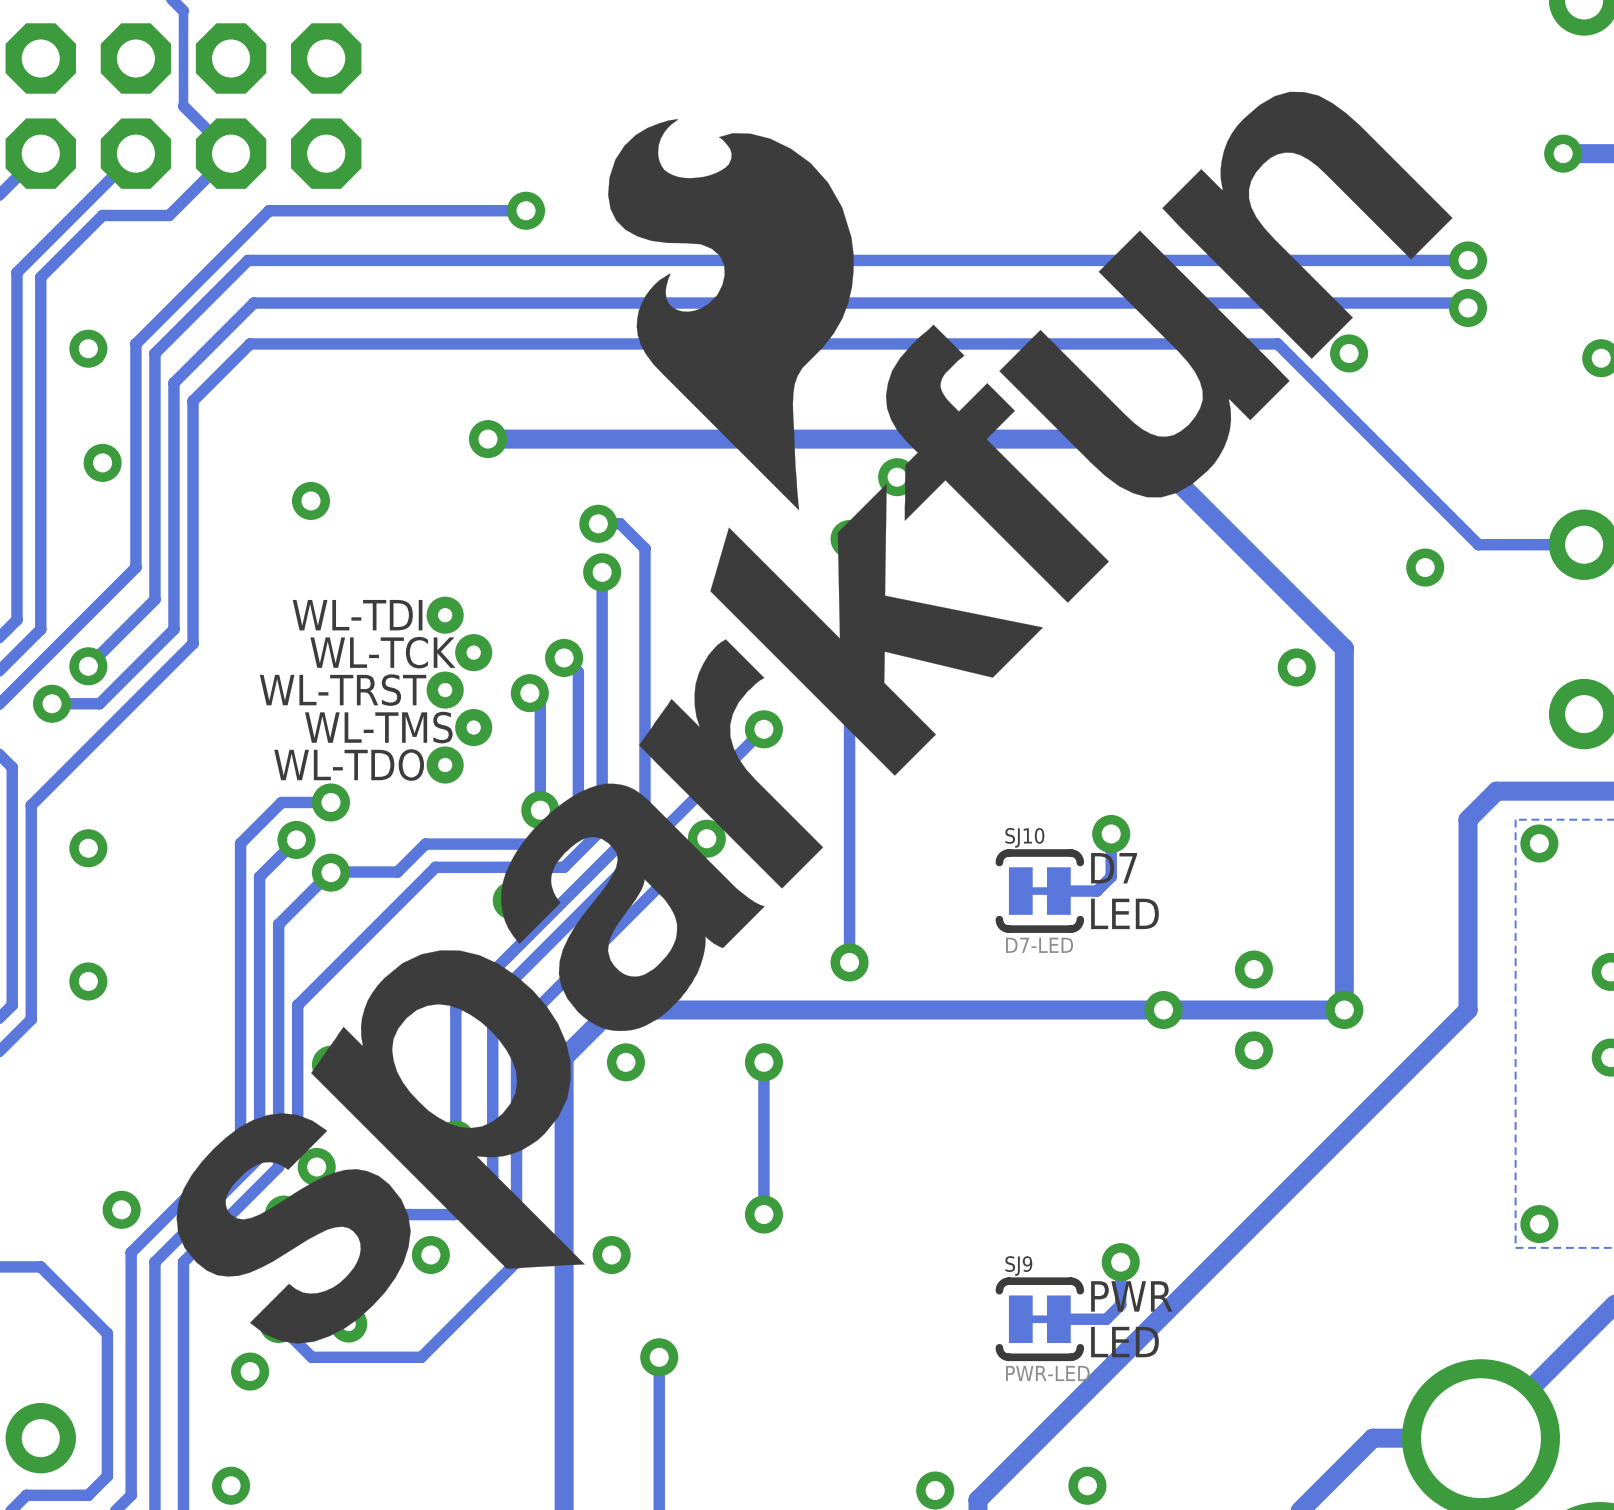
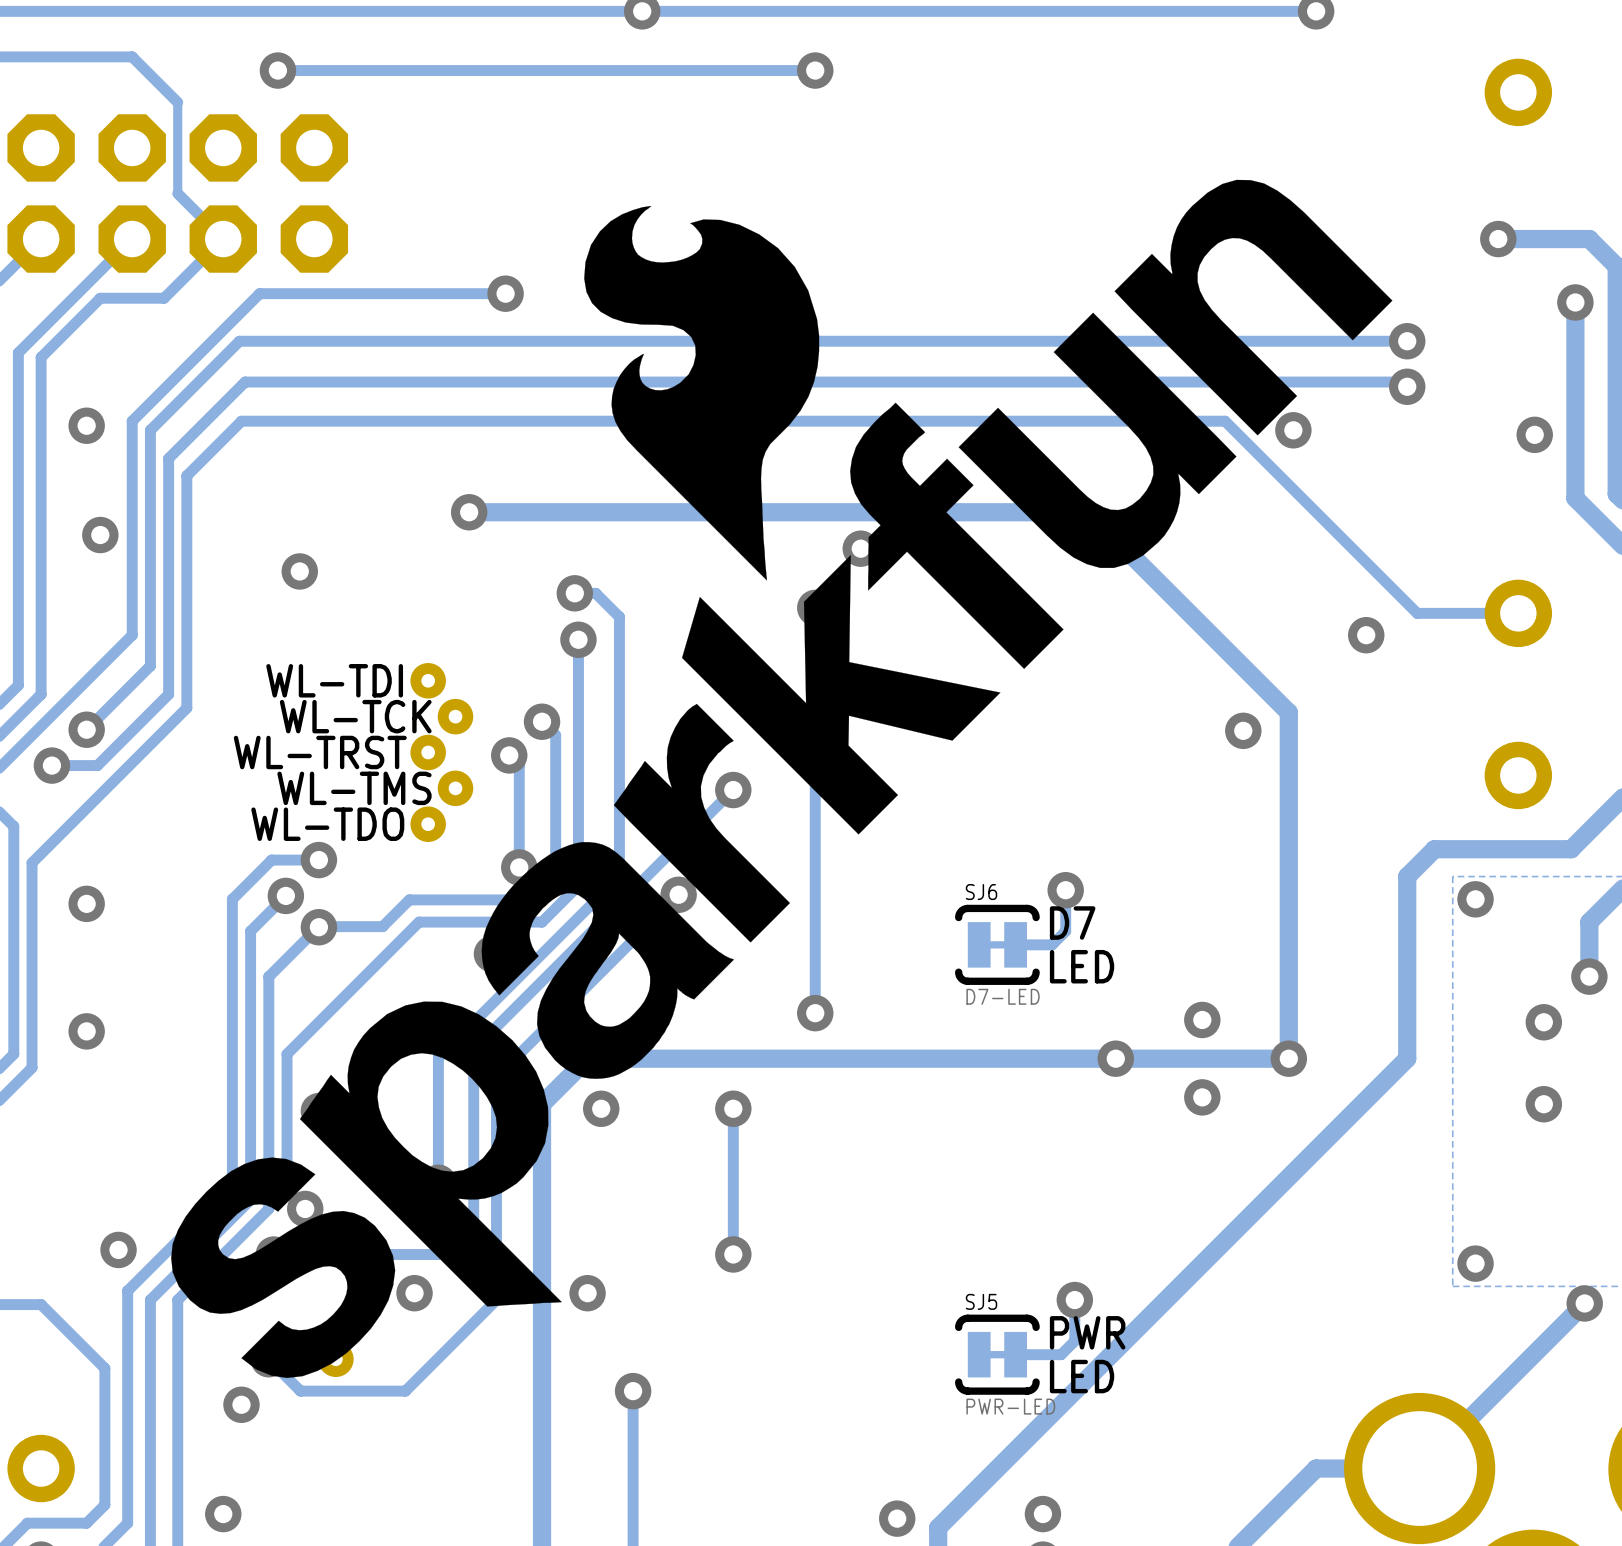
SJ10 name: SJ10 (1024, 837) -> SJ6 (981, 892)
SJ9 name: SJ9 (1018, 1266) -> SJ5 (981, 1301)

